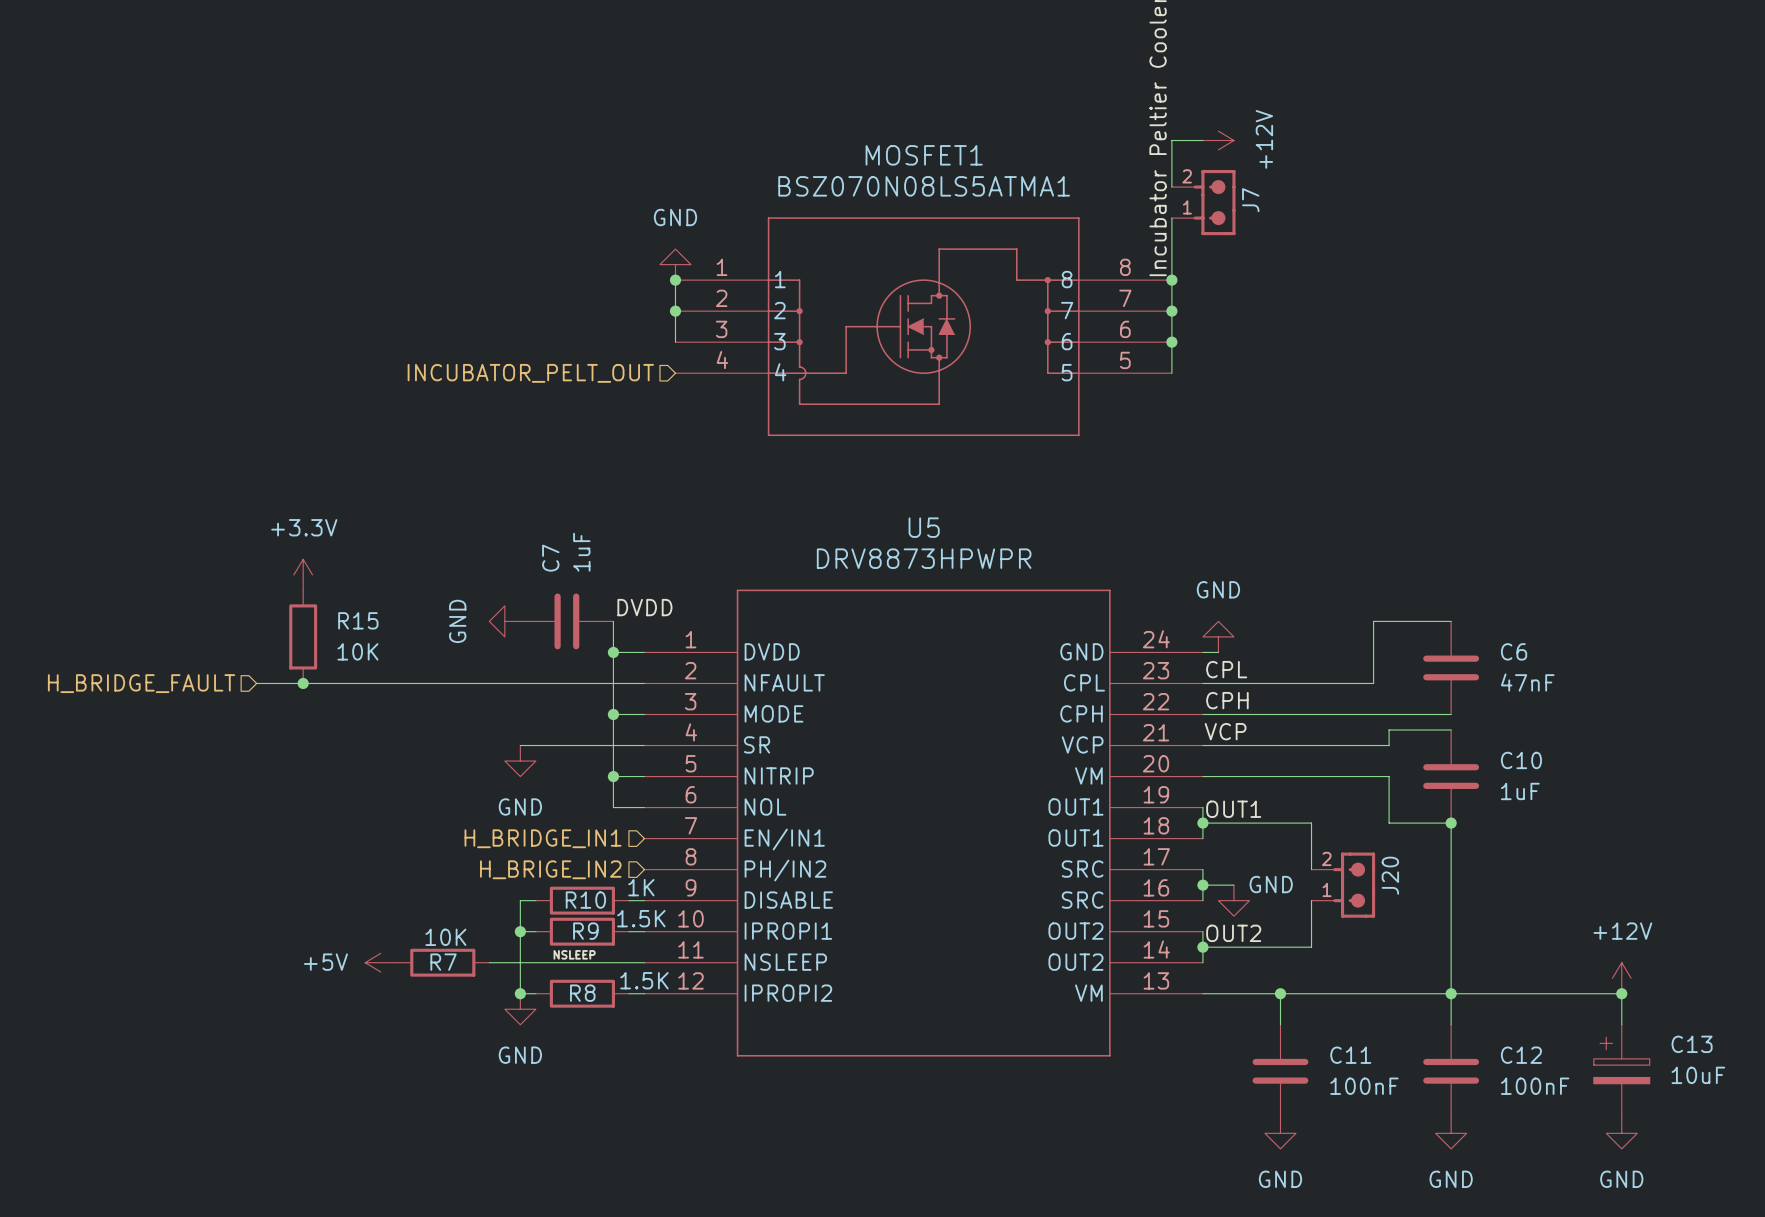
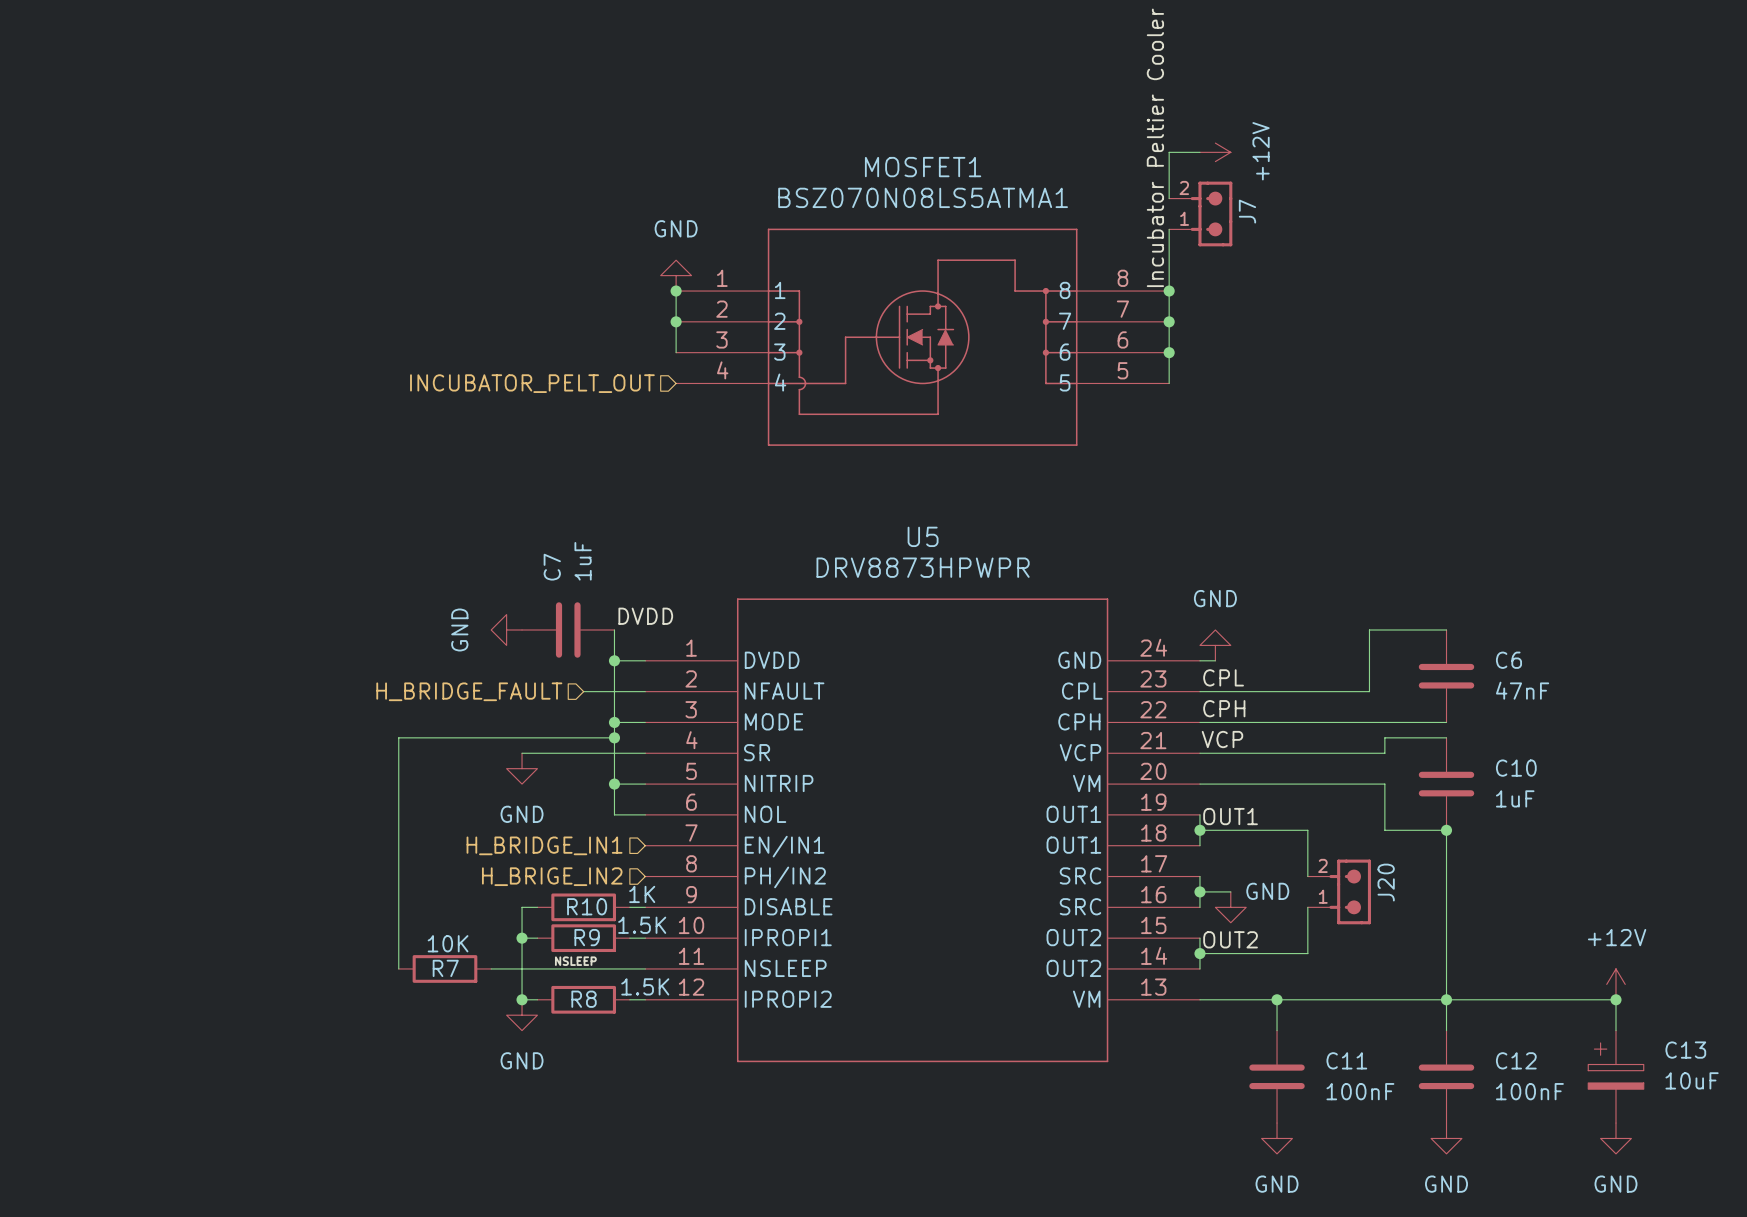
power symbol: +3.3V (303, 574) -> none
R15: 10K (303, 636) -> none
hierarchical label: H_BRIDGE_FAULT (141, 683) -> none
wire: (256, 683) (582, 683) -> none
junction: (303, 683) -> none
hierarchical label: none -> H_BRIDGE_FAULT (469, 691)
wire: none -> (614, 737) (398, 737) (398, 968)
junction: none -> (614, 737)
power symbol: +5V (380, 962) -> none

